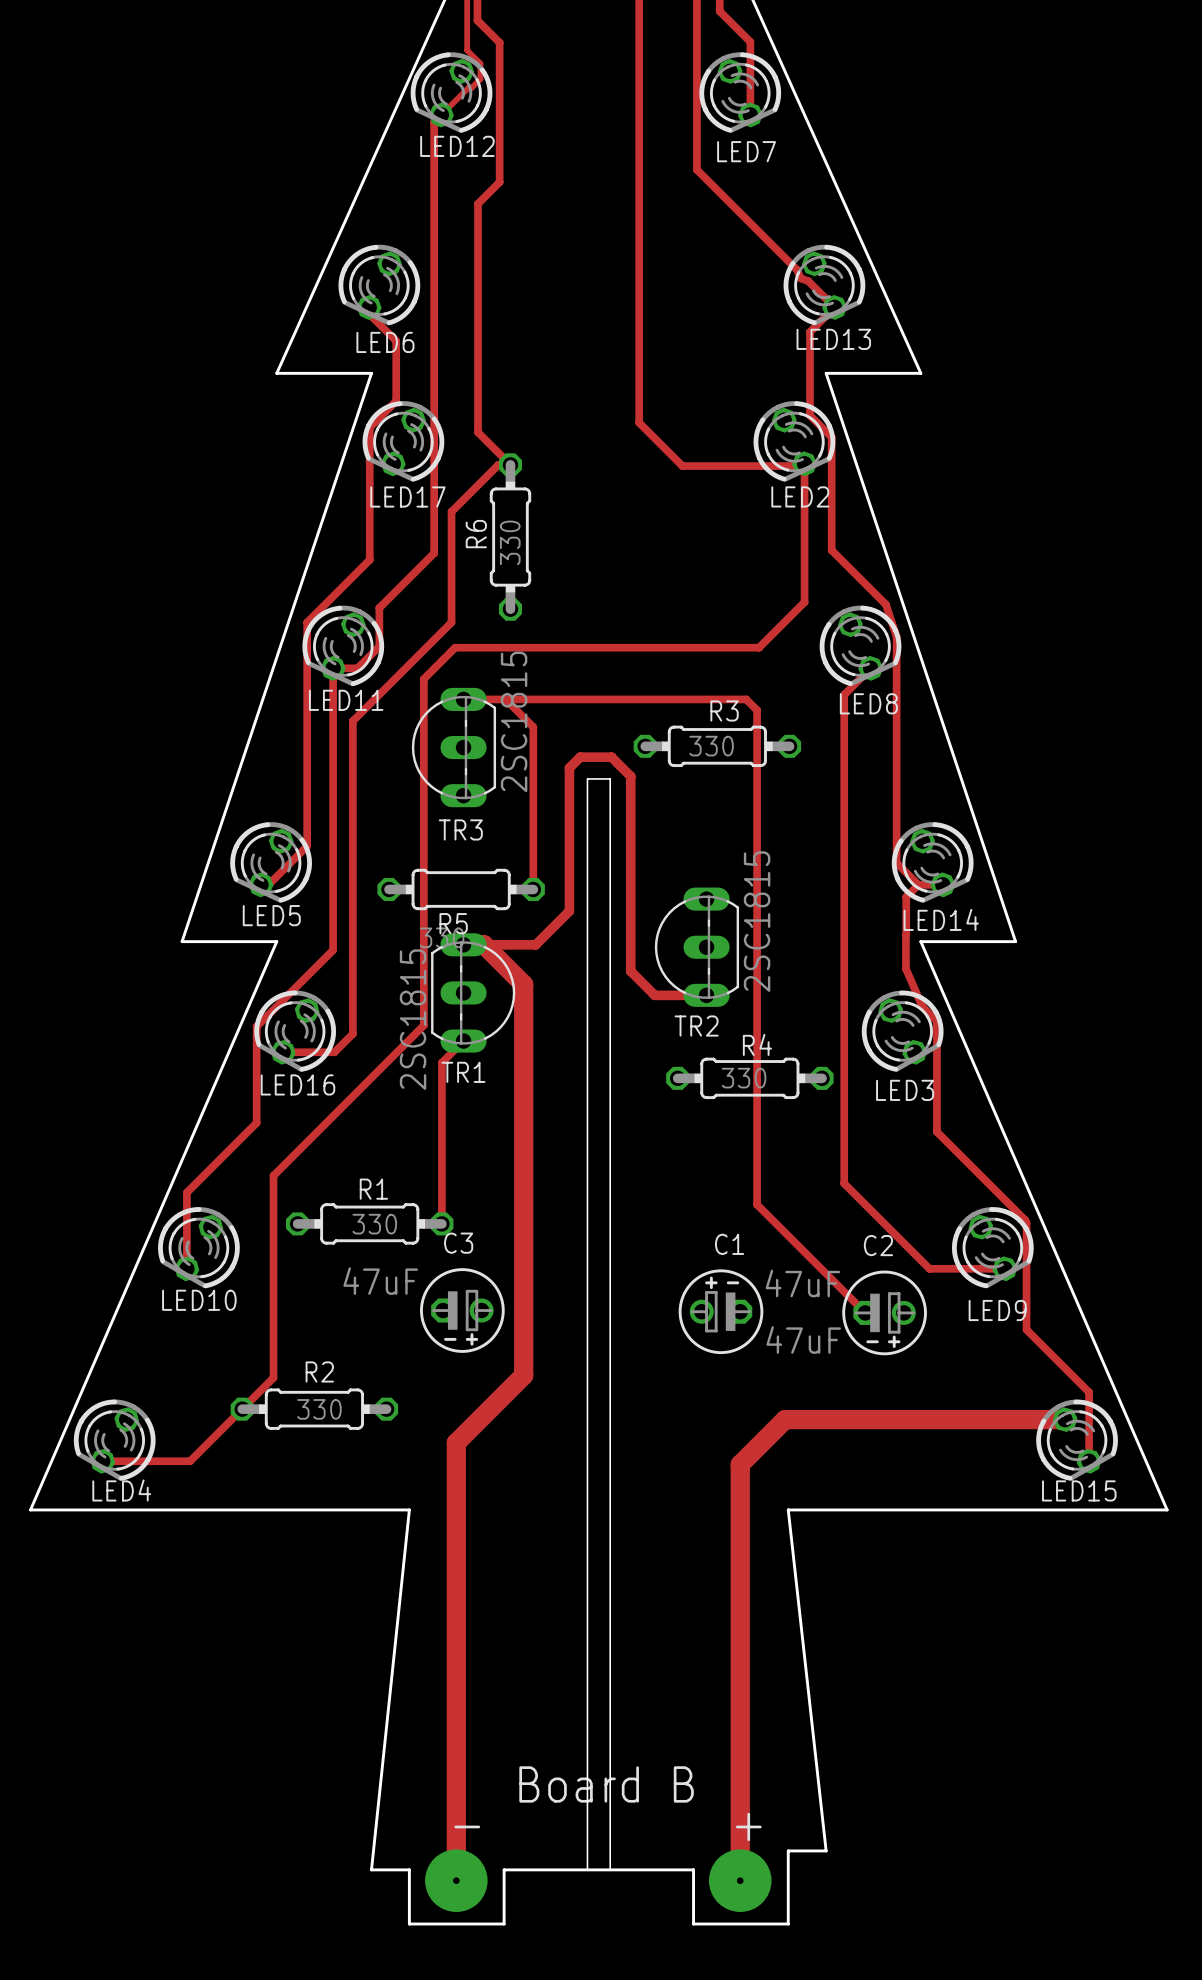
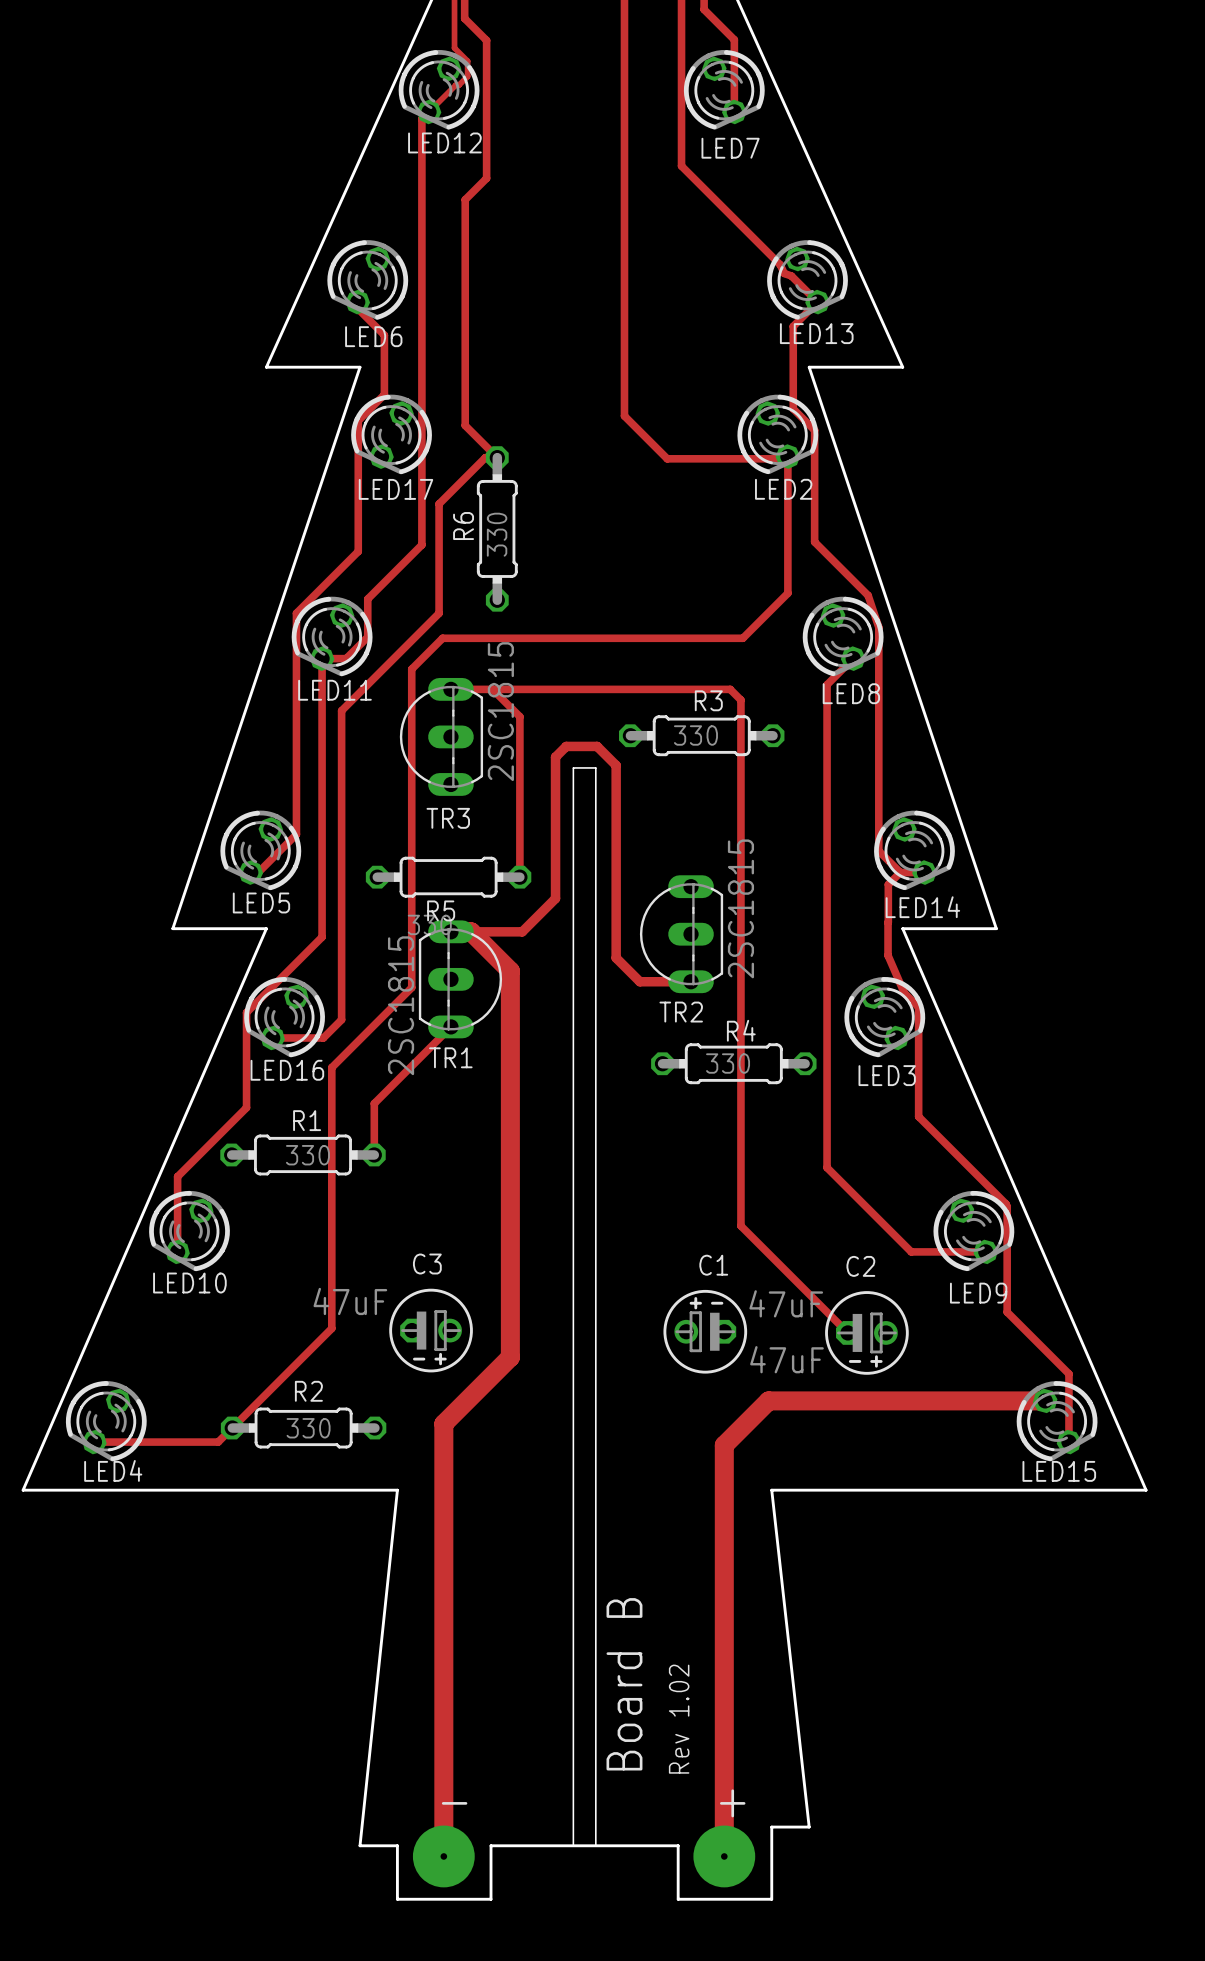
track: (423, 1001) (423, 1025) (273, 1175) (273, 1377) (190, 1461) -> (411, 987) (331, 1067) (331, 1328) (218, 1442) (180, 1442)
track: (441, 1062) (441, 1223) -> (429, 1048) (374, 1103) (374, 1154)
track: (757, 1204) (865, 1312) -> (740, 1188) (740, 1225) (847, 1332)
R1 position: (369, 1223) -> (303, 1154)
C3 position: (462, 1310) -> (431, 1330)
C1 position: (720, 1311) -> (705, 1331)
C2 position: (884, 1312) -> (866, 1332)
R2 position: (314, 1409) -> (303, 1428)
text: none -> Rev 1.02 (679, 1719)
text rotation: 0° (606, 1784) -> 90° counterclockwise (624, 1684)

